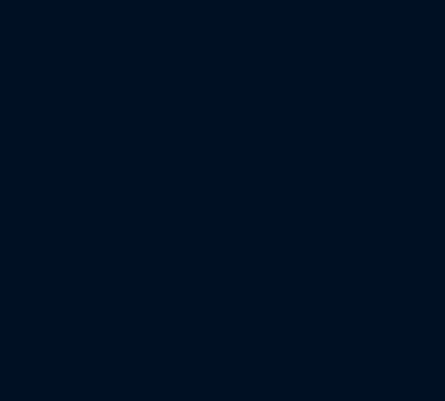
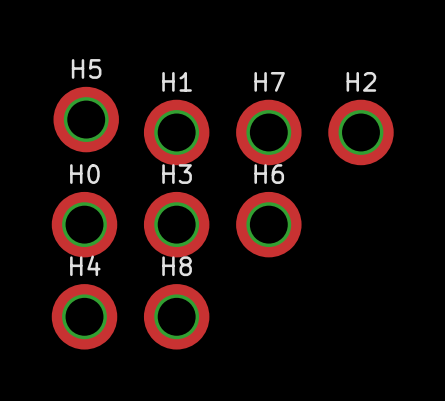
H5: none -> (86, 119)
H1: none -> (176, 132)
H7: none -> (268, 132)
H2: none -> (360, 132)
H0: none -> (84, 224)
H3: none -> (176, 224)
H6: none -> (268, 224)
H4: none -> (84, 316)
H8: none -> (176, 316)

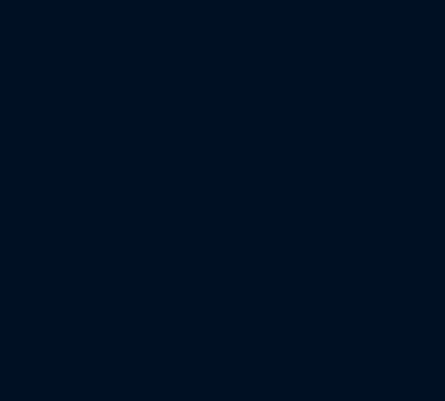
H5: (86, 119) -> none
H1: (176, 132) -> none
H7: (268, 132) -> none
H2: (360, 132) -> none
H0: (84, 224) -> none
H3: (176, 224) -> none
H6: (268, 224) -> none
H4: (84, 316) -> none
H8: (176, 316) -> none

